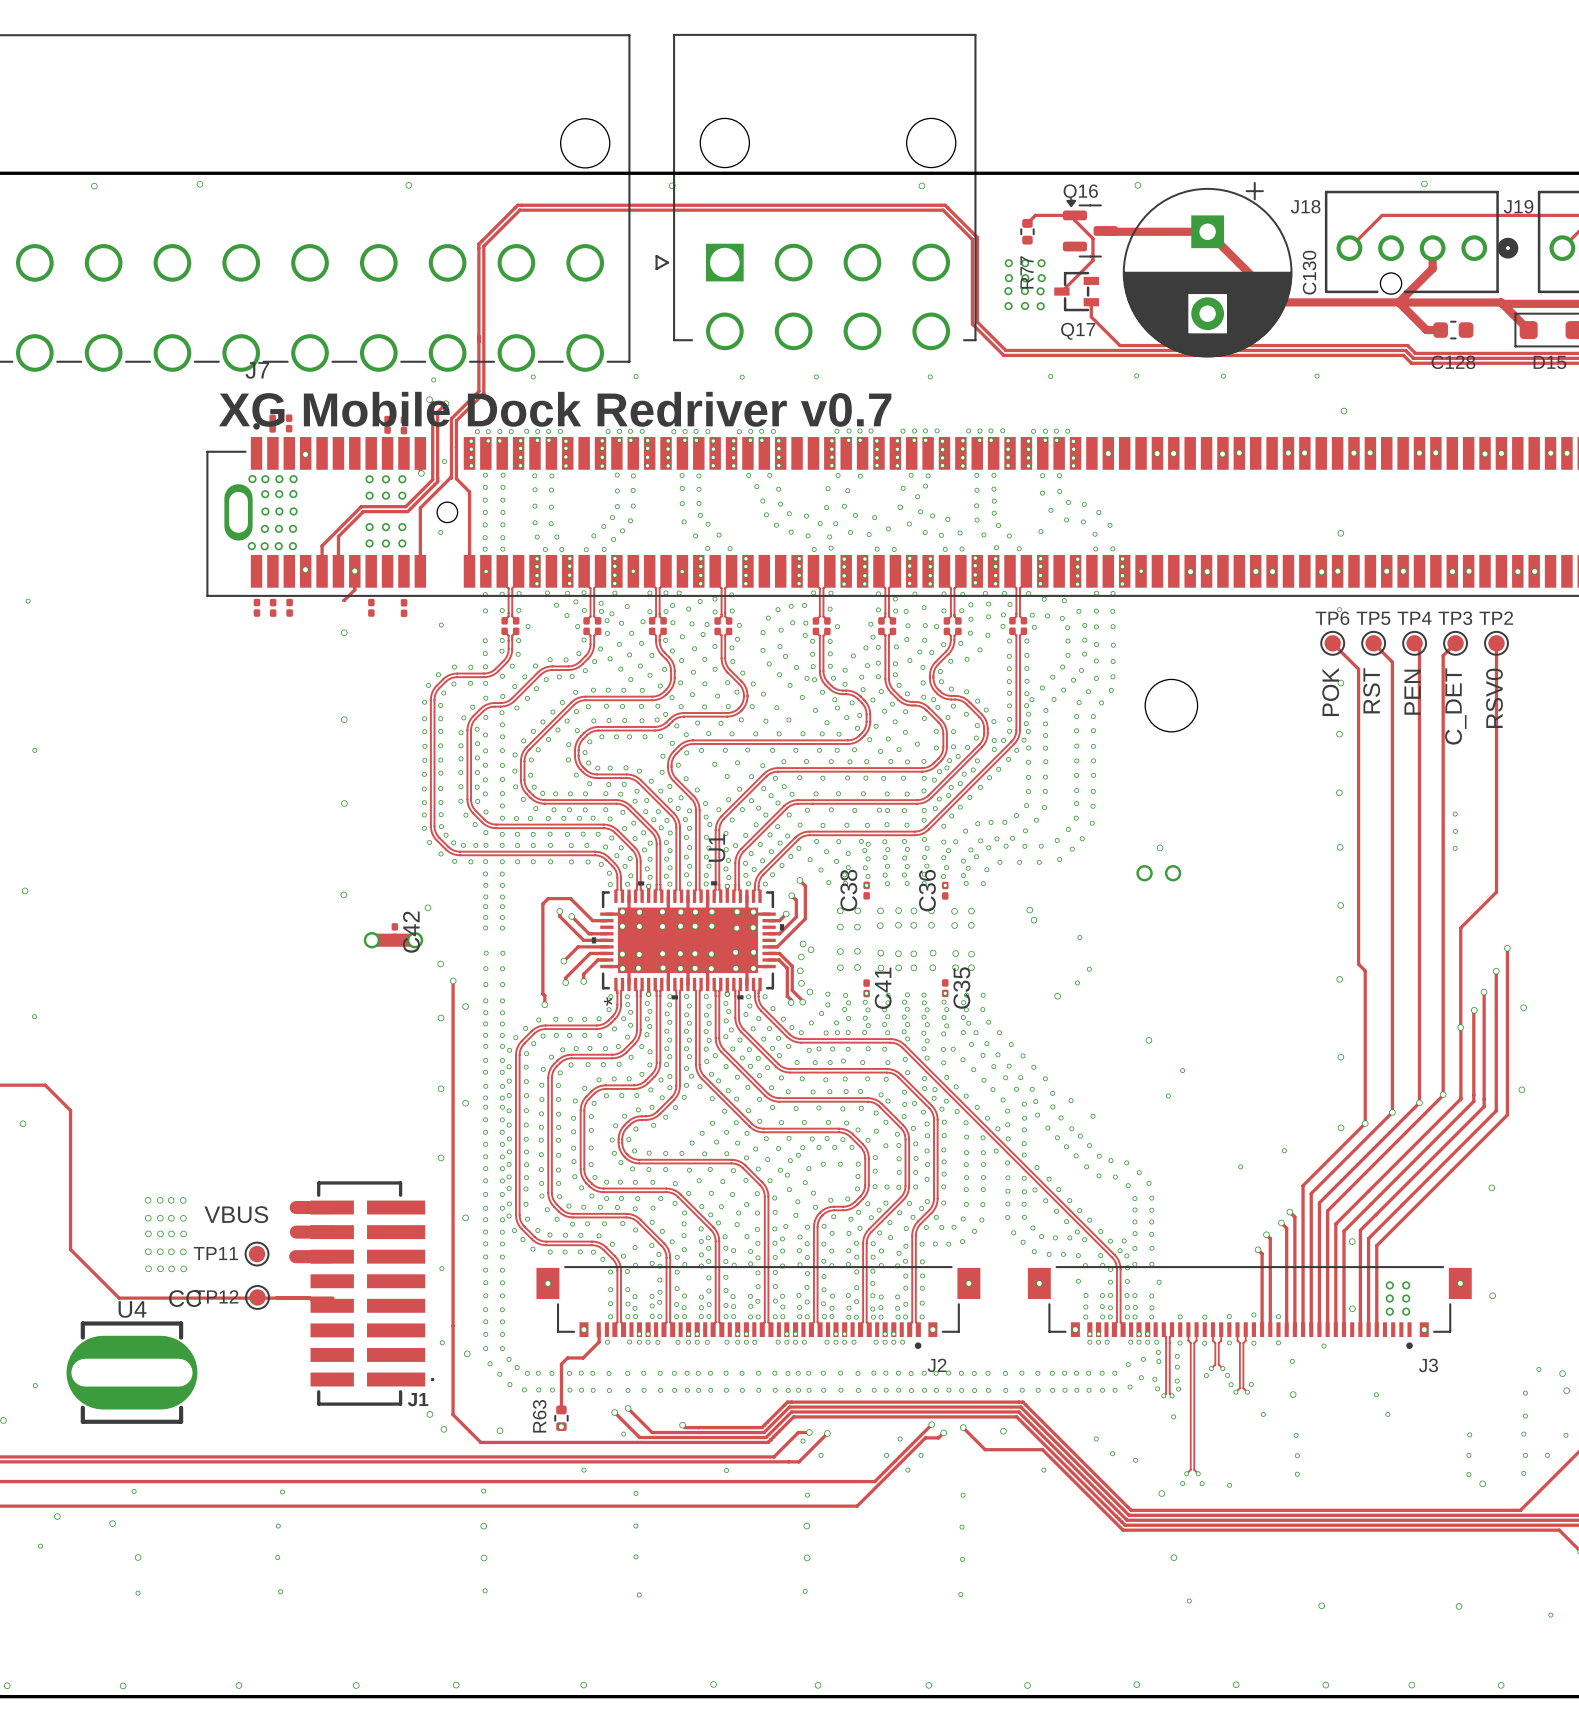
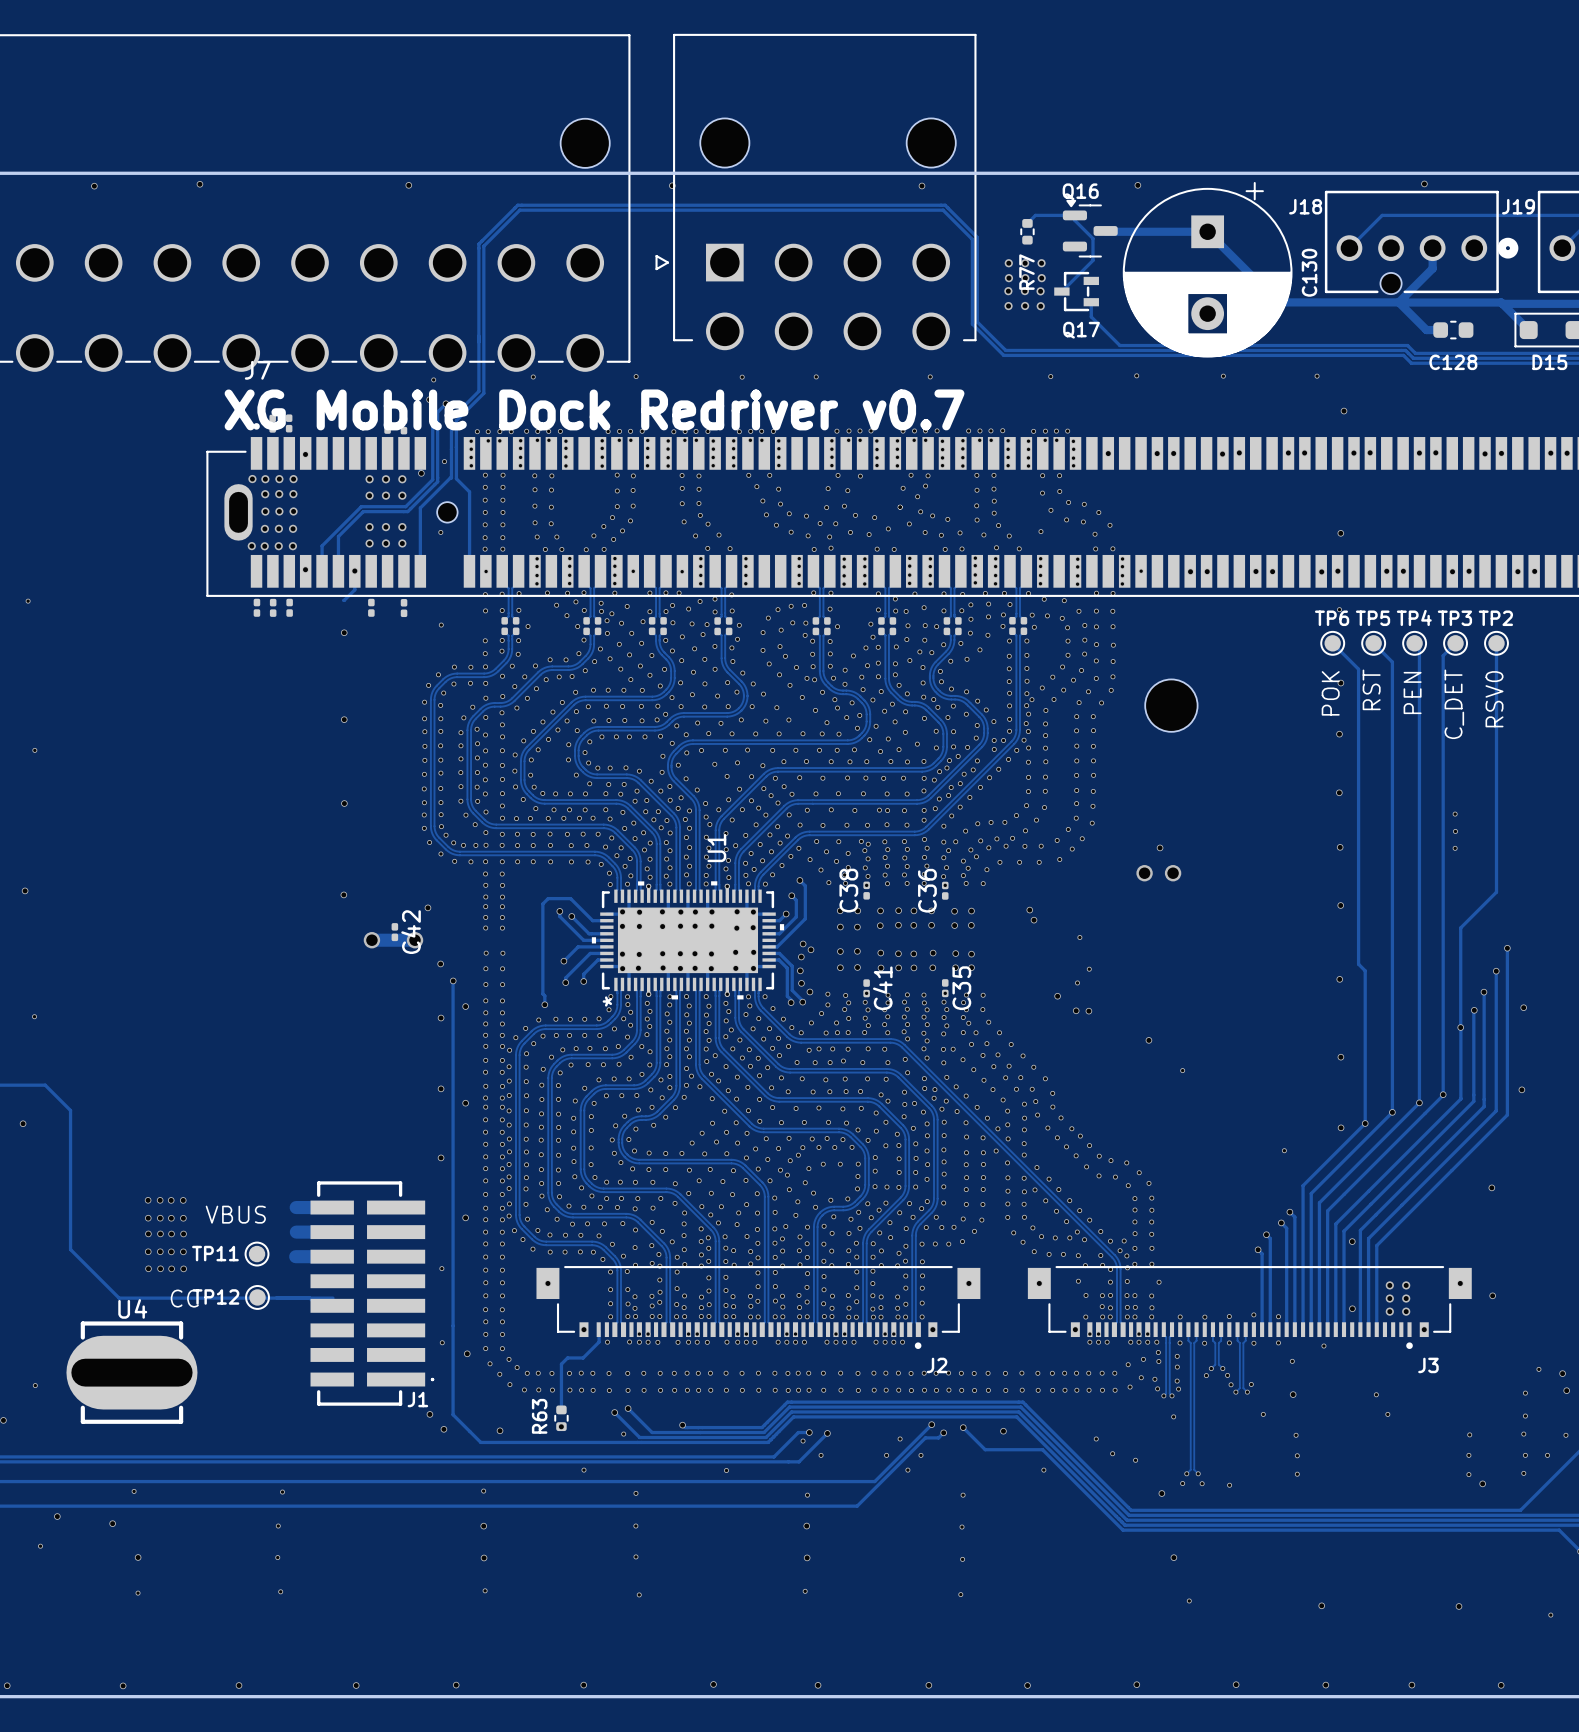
via: none -> (1076, 1010)
via: none -> (1088, 1011)
via: (1168, 1095) -> none
via: (1071, 1100) -> none
via: (1092, 1116) -> none
via: (1240, 1166) -> none
via: (1085, 1307) -> none

